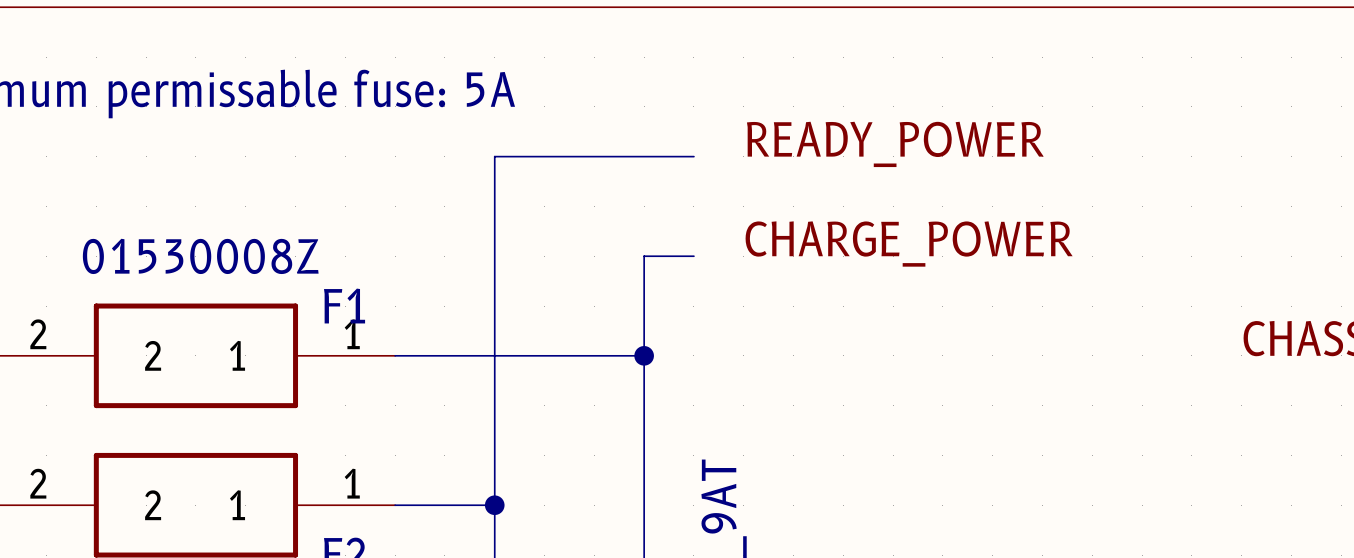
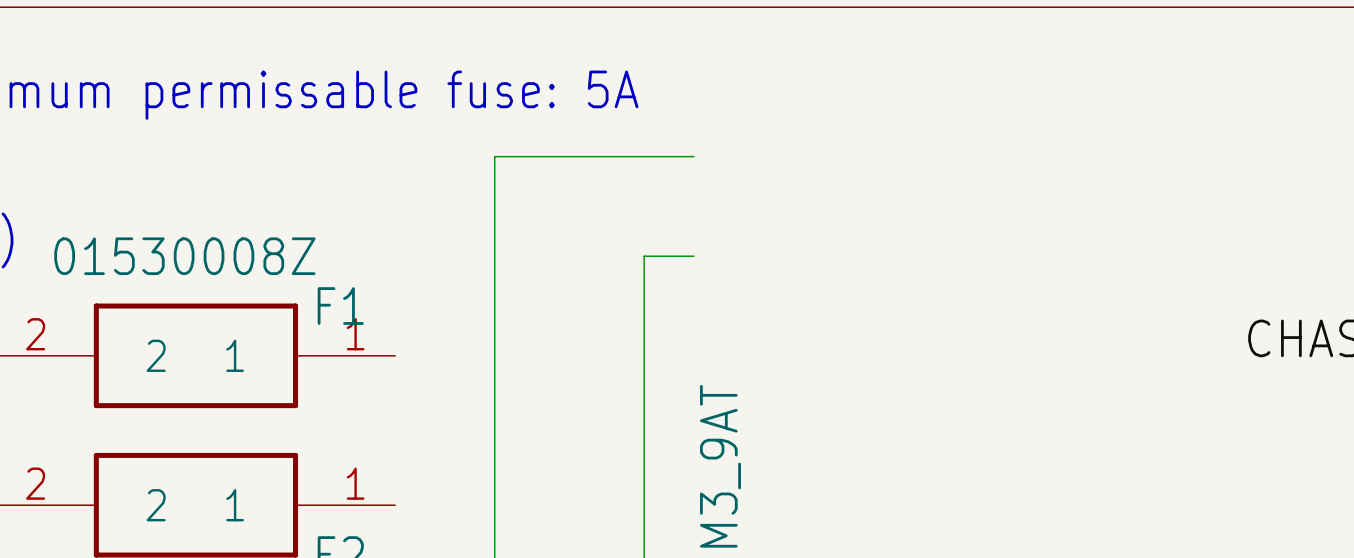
label: READY_POWER (895, 144) -> none
label: CHARGE_POWER (909, 244) -> none
wire: (395, 355) (644, 355) -> none
junction: (644, 355) -> none
wire: (395, 505) (494, 505) -> none
junction: (494, 505) -> none

